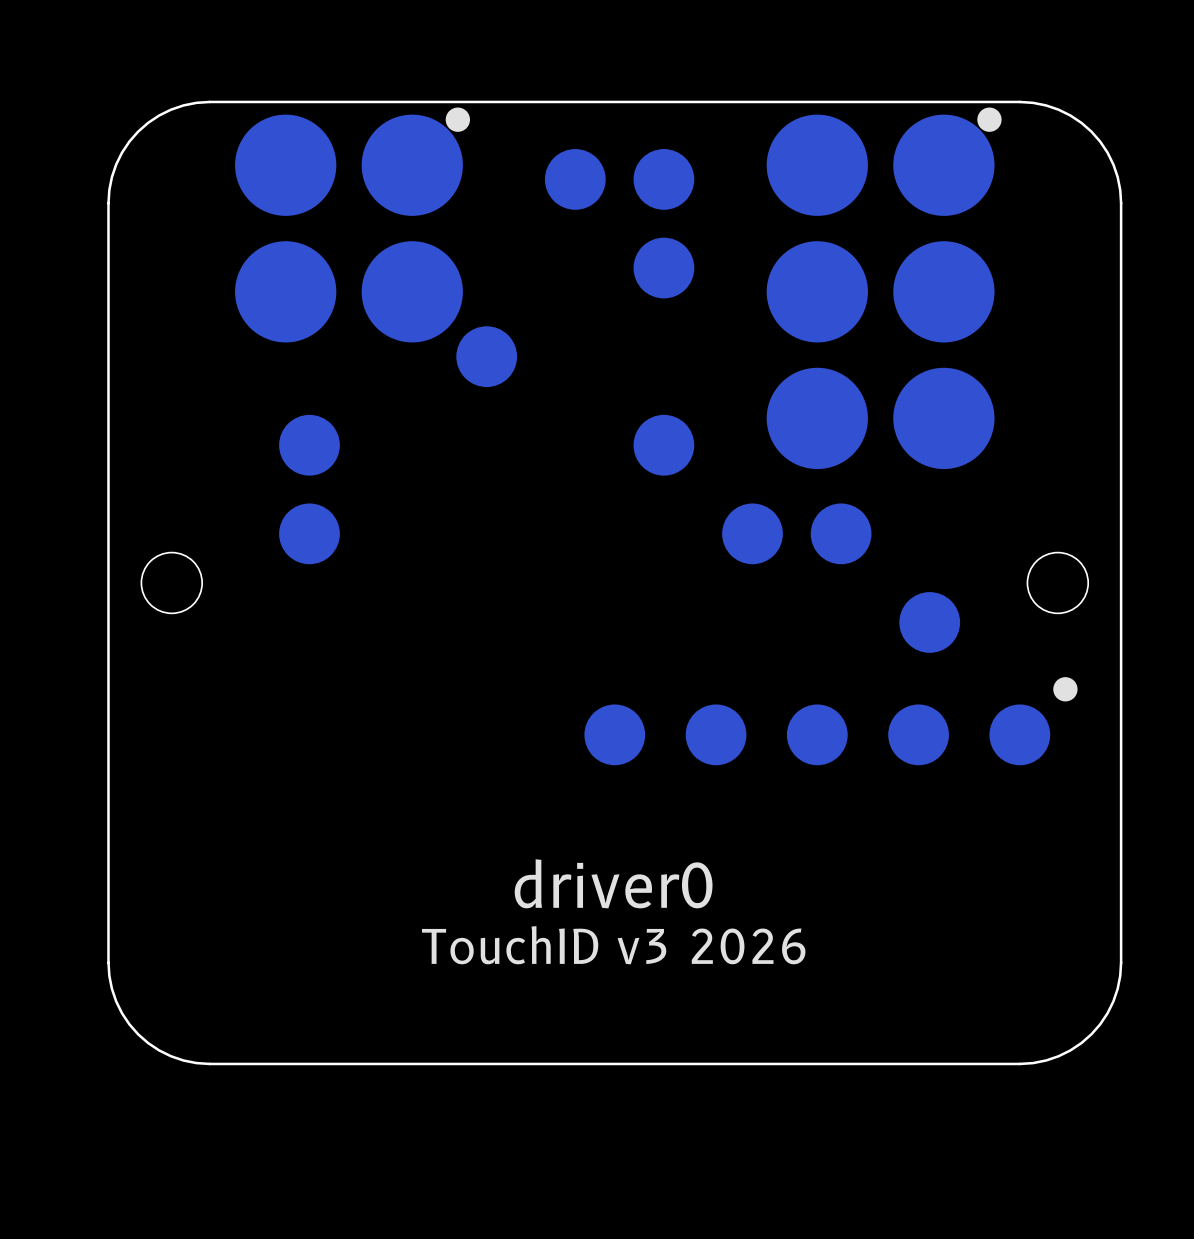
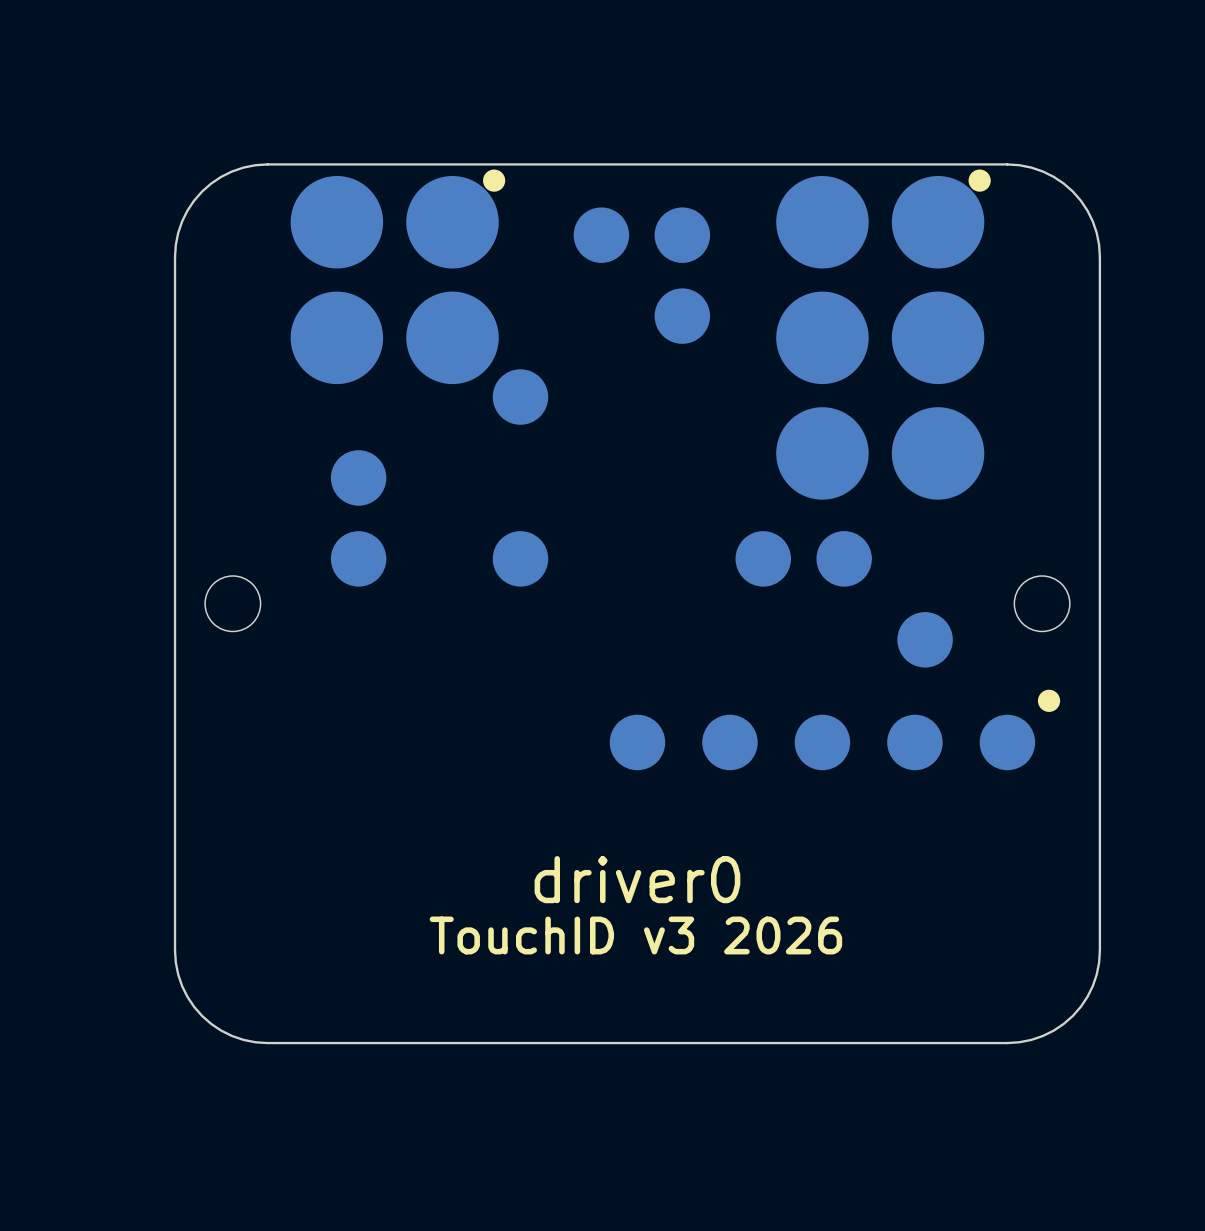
part position: (663, 445) -> (520, 558)

